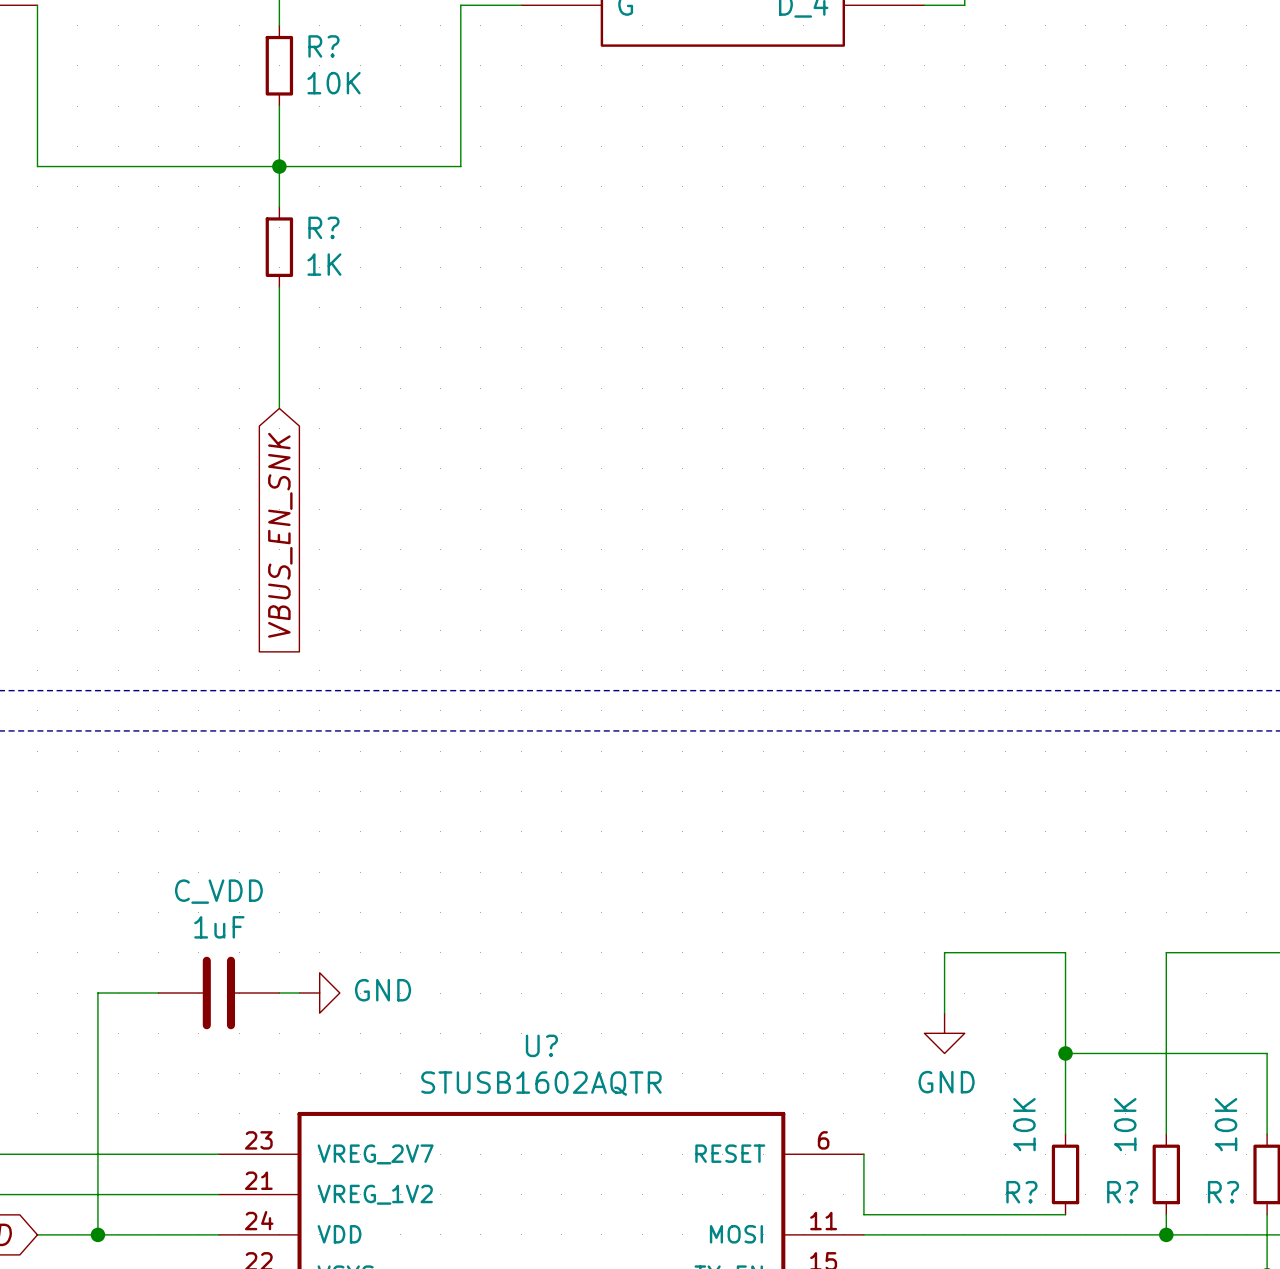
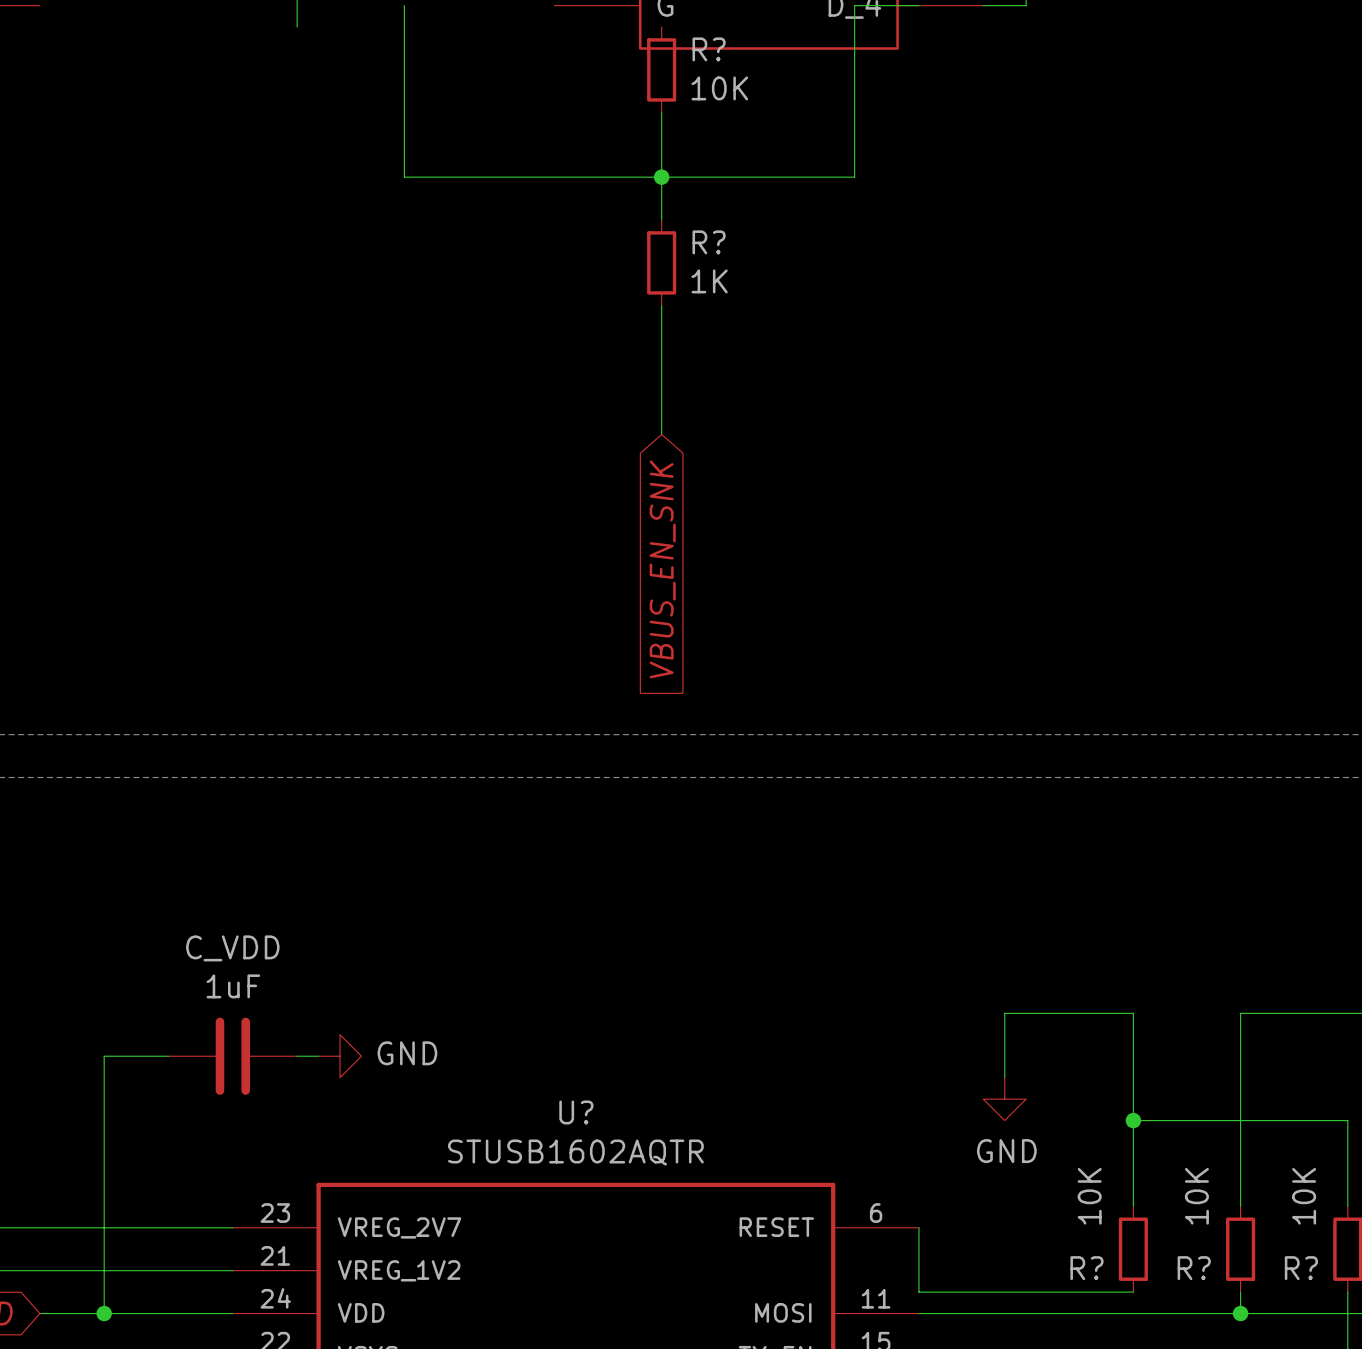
wire: (37, 5) (37, 166) (380, 166) -> (404, 5) (404, 177)
wire: (521, 5) (460, 5) (460, 166) -> (918, 5) (854, 5) (854, 177) (490, 177)
R? position: (279, 65) -> (661, 69)
wire: (279, 106) (279, 206) -> (661, 112) (661, 220)
junction: (279, 166) -> none
junction: none -> (661, 177)
R? position: (279, 247) -> (661, 262)
wire: (279, 287) (279, 408) -> (661, 305) (661, 434)
global label position: VBUS_EN_SNK (280, 535) -> VBUS_EN_SNK (662, 569)

